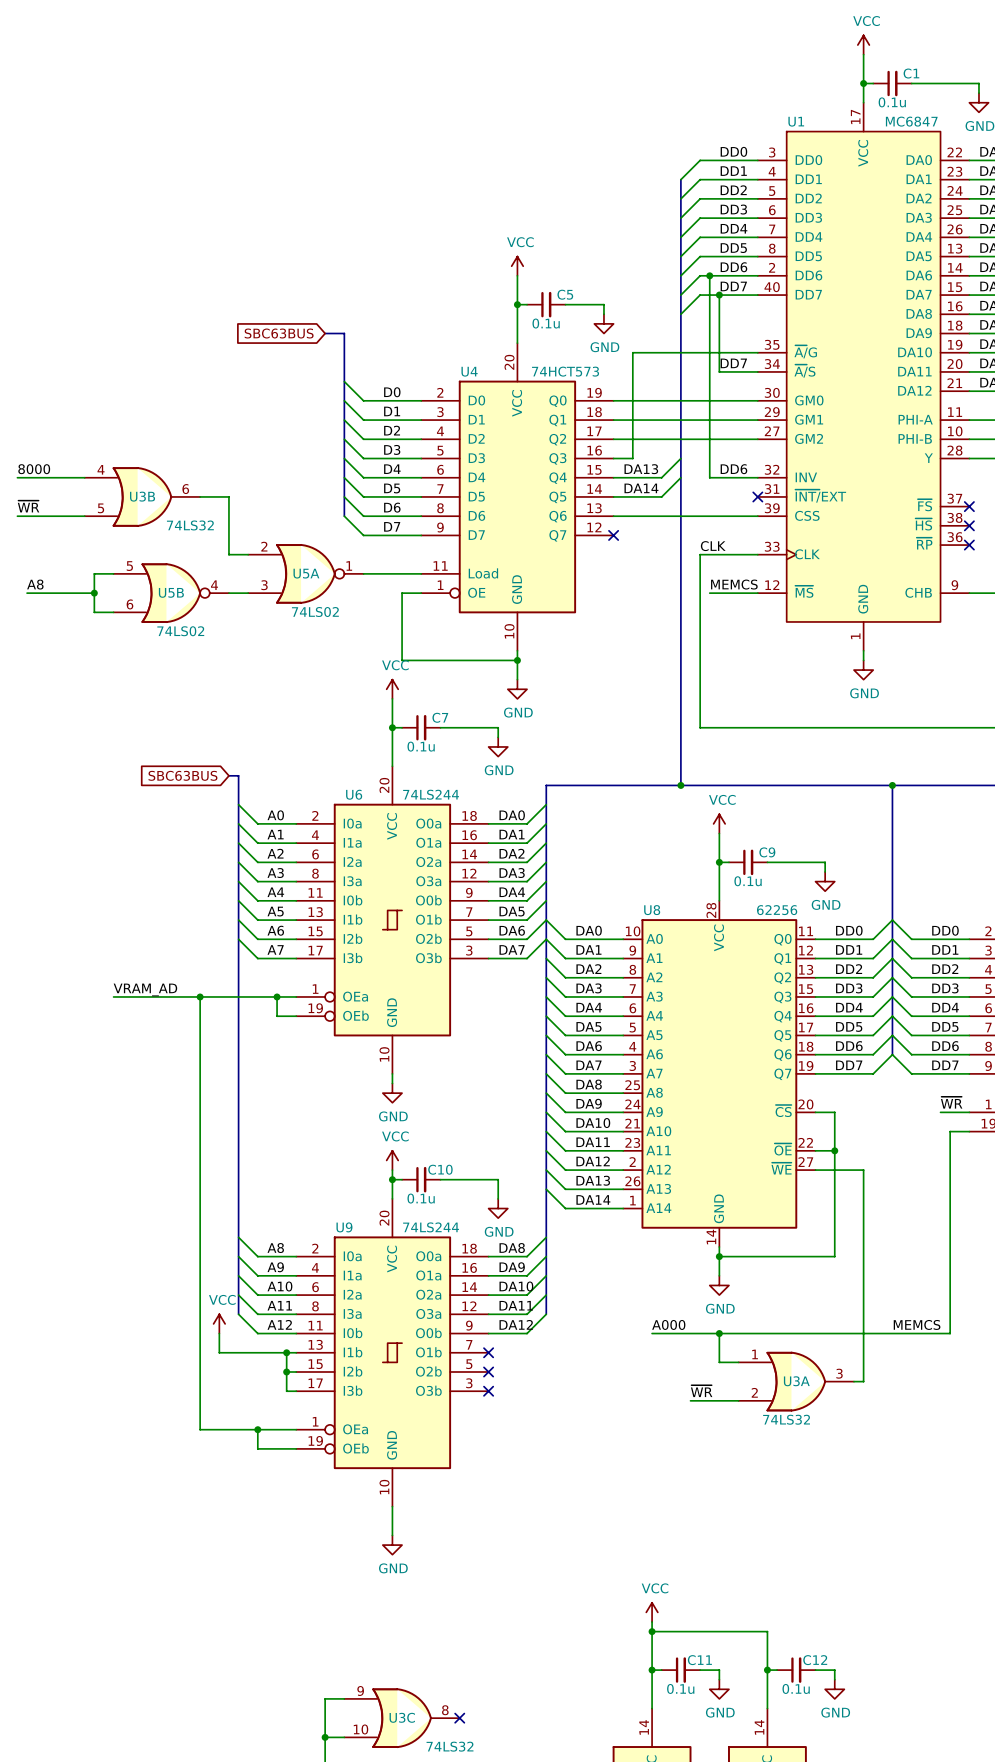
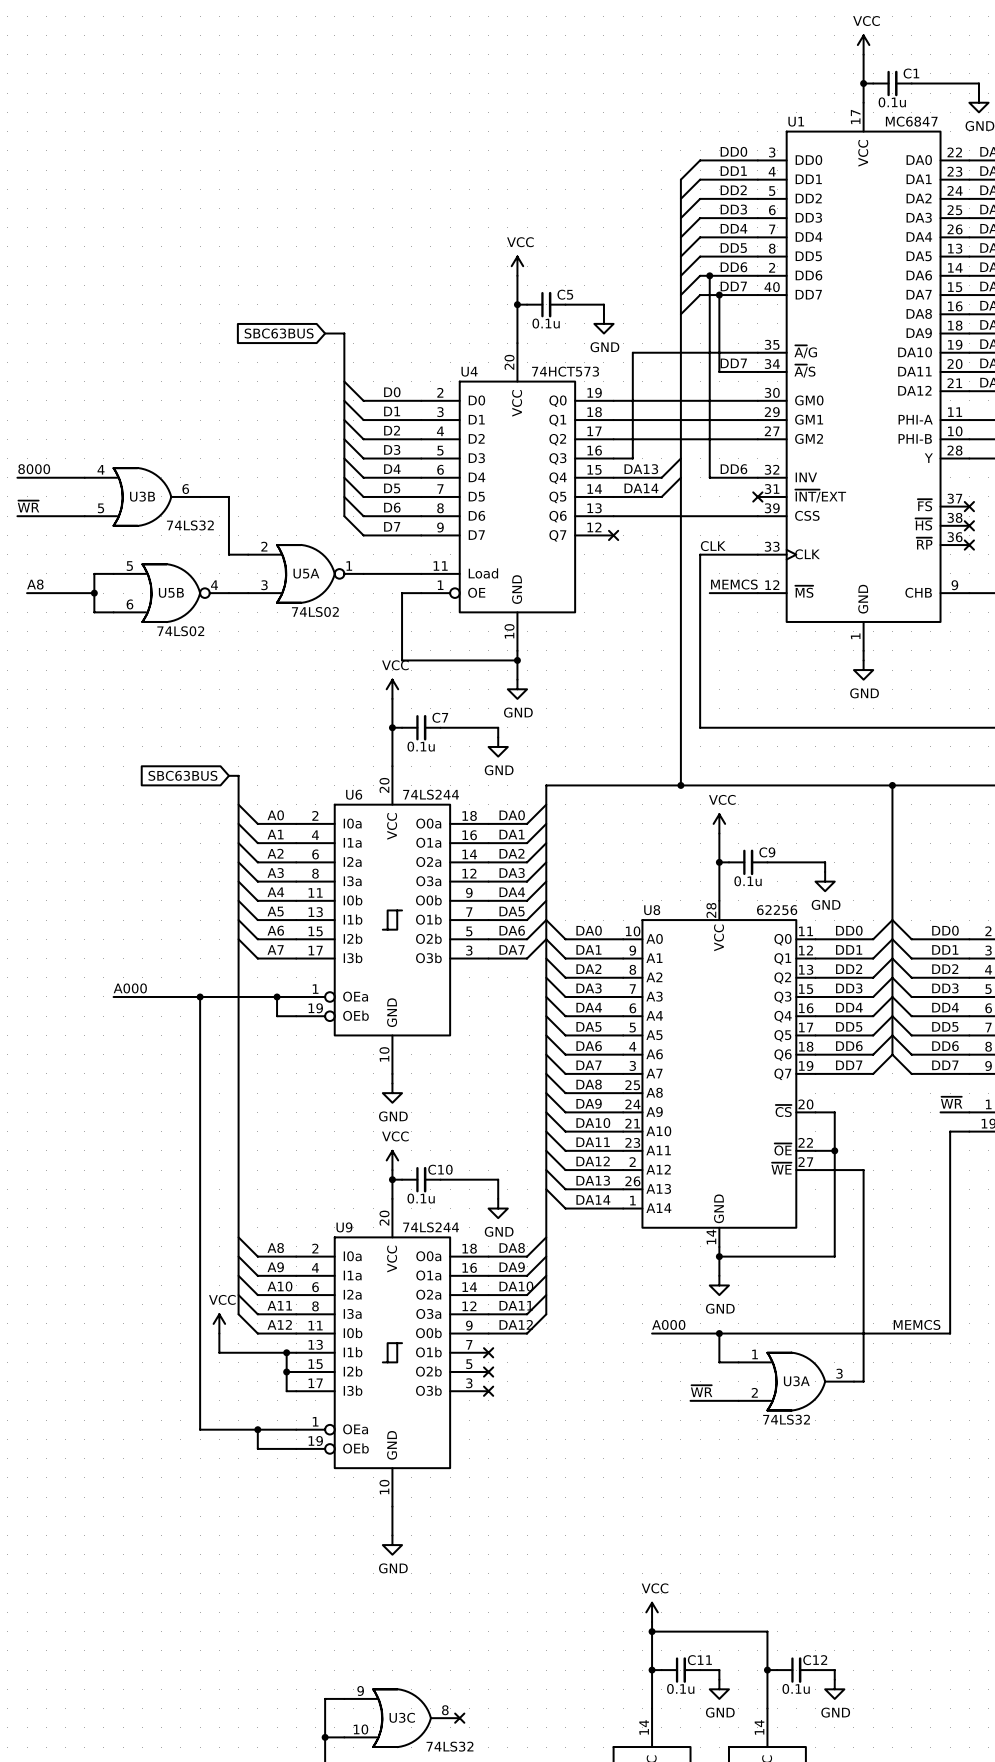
label: VRAM_AD (145, 989) -> A000 (130, 988)

